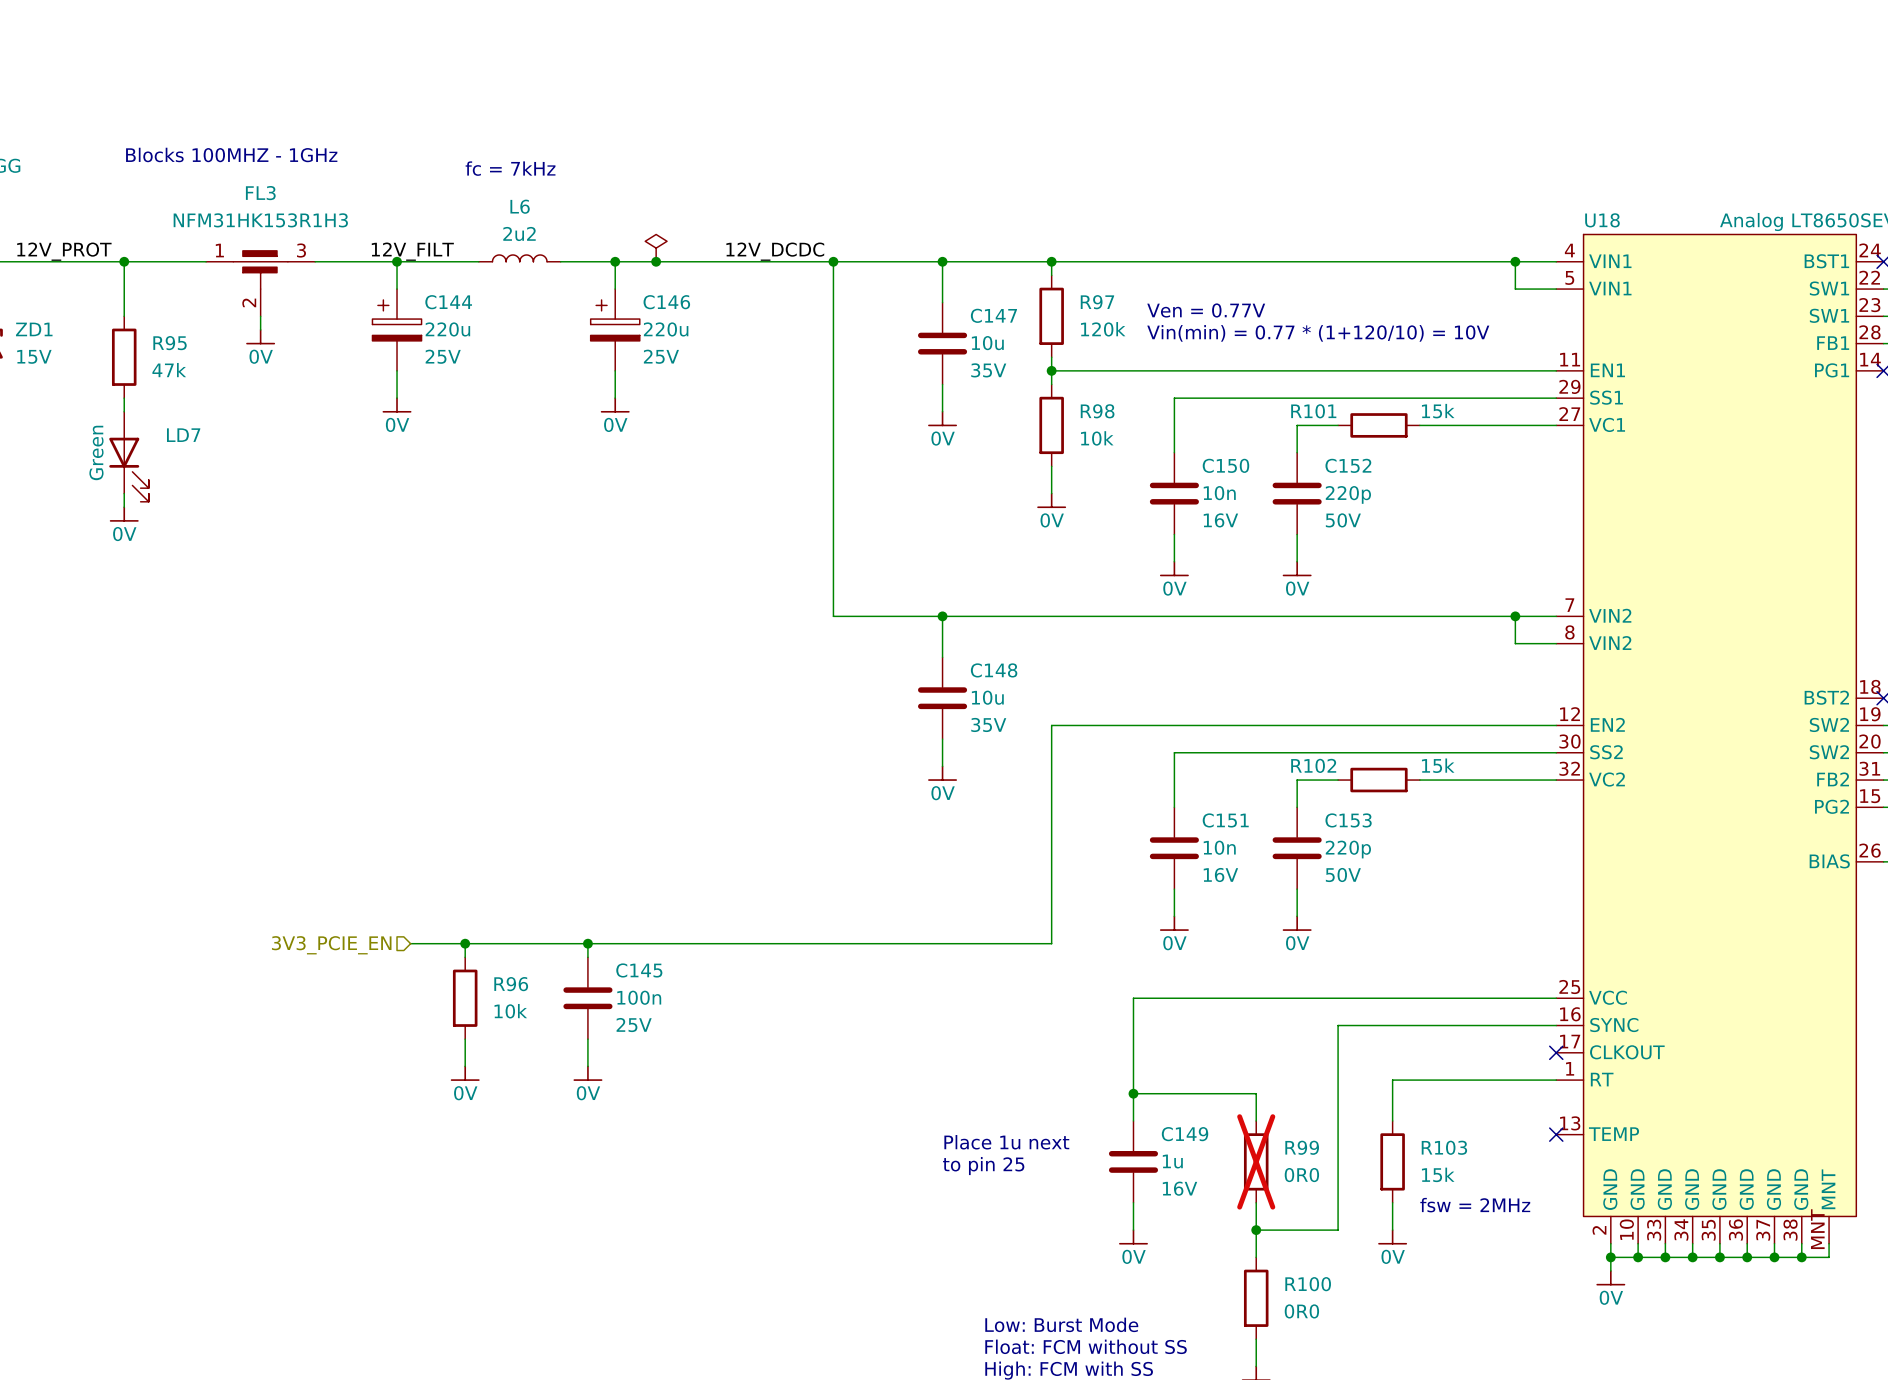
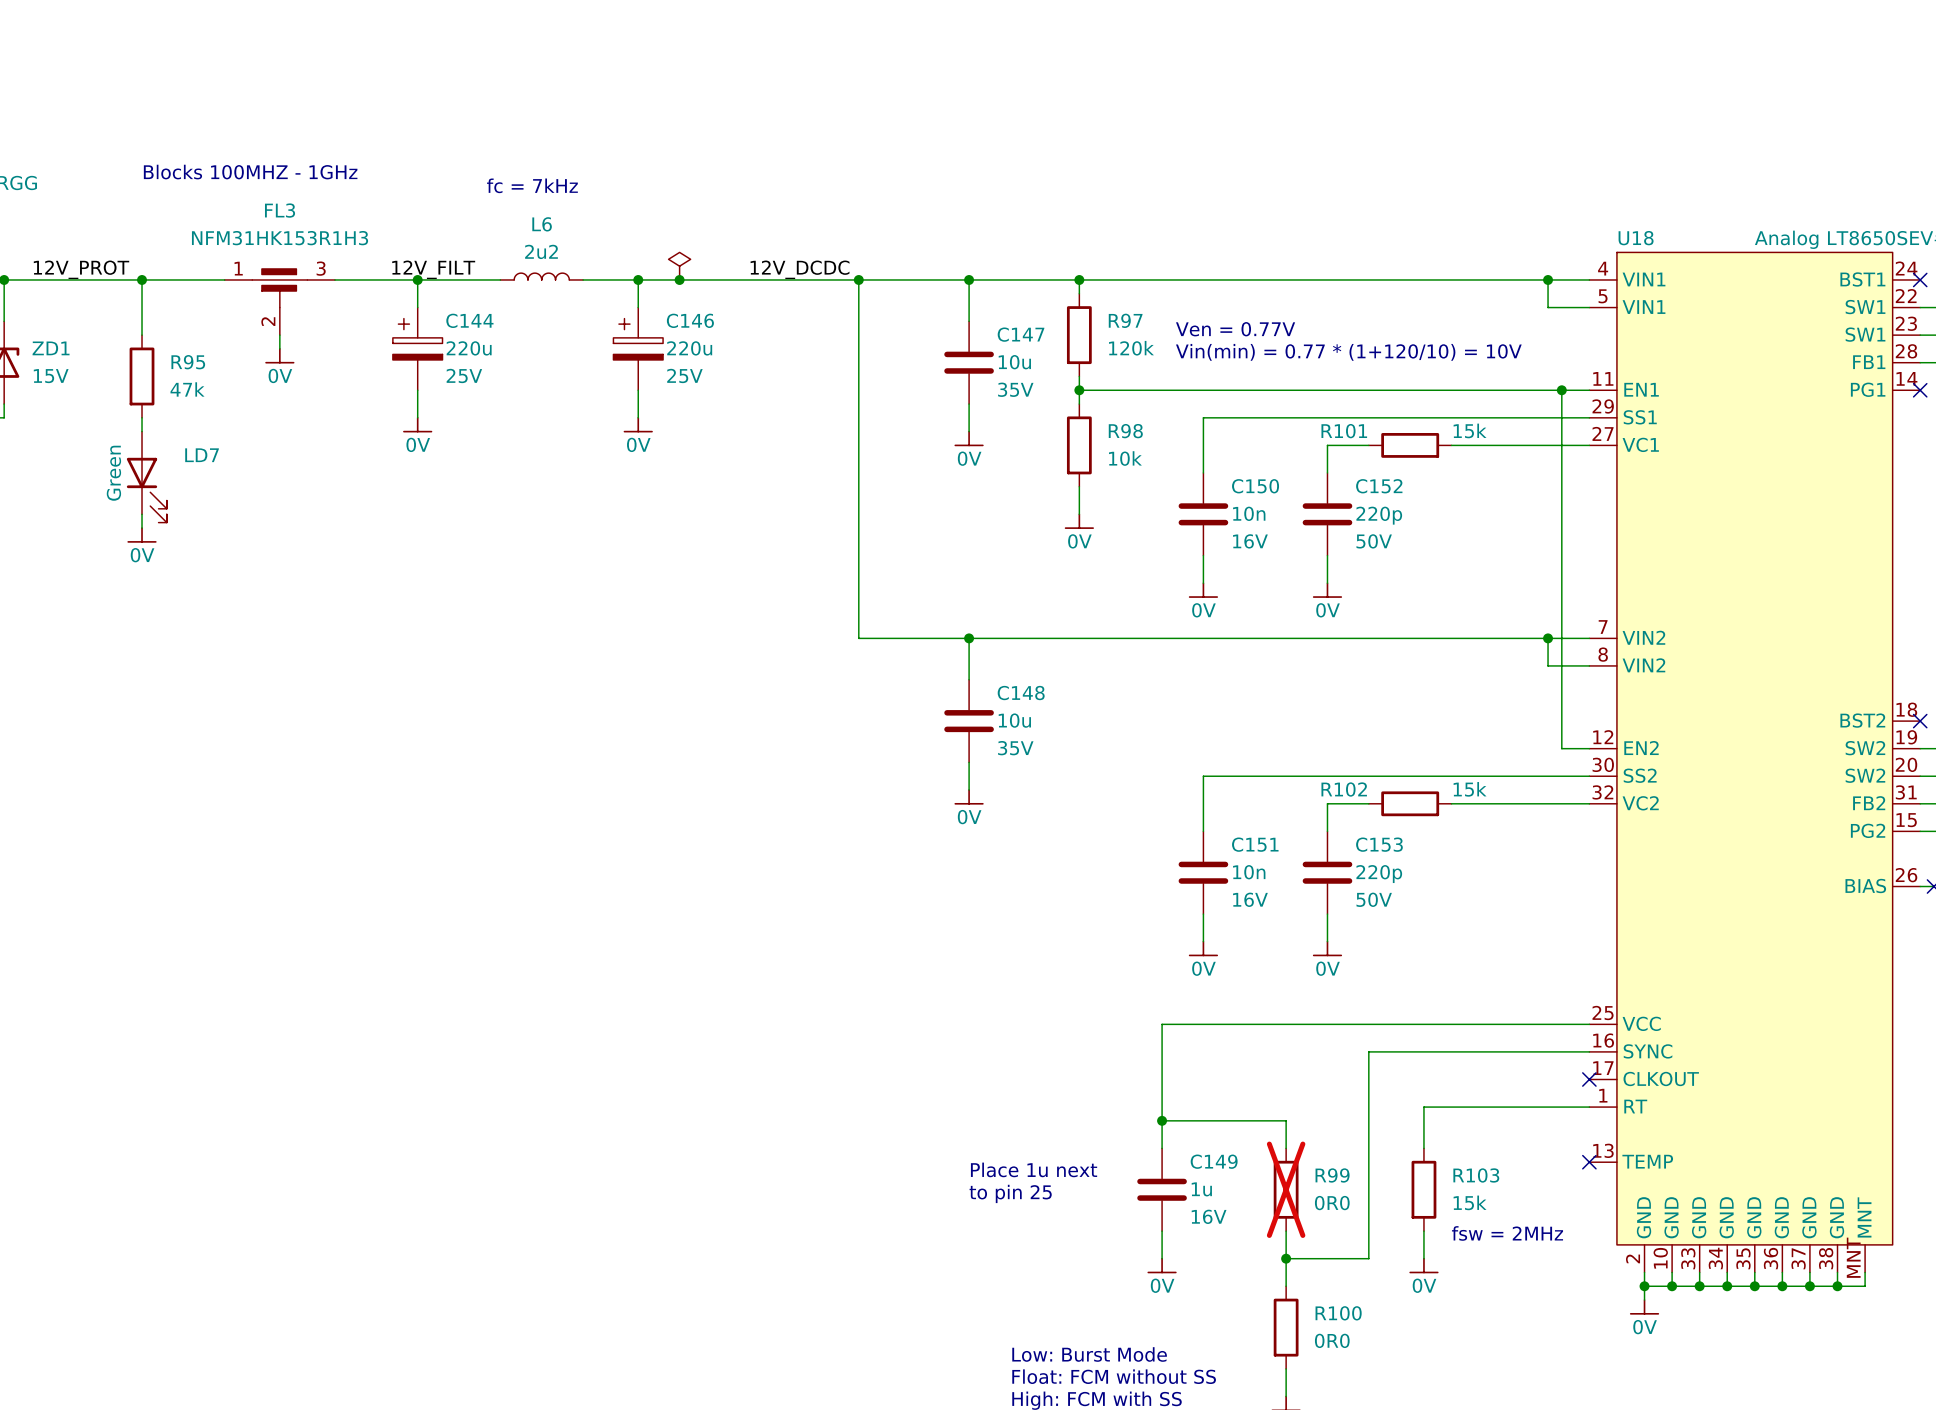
junction: none -> (1561, 390)
wire: (1529, 725) (1051, 725) (1051, 943) (410, 943) -> (1561, 748) (1561, 390)
wire: (465, 943) (465, 957) -> none
junction: (465, 943) -> none
wire: (587, 943) (587, 957) -> none
junction: (587, 943) -> none
hierarchical label: 3V3_PCIE_EN (331, 945) -> none
R96: 10k (465, 998) -> none
C145: 100n (587, 998) -> none
wire: (465, 1039) (465, 1066) -> none
wire: (587, 1039) (587, 1066) -> none
power symbol: 0V (465, 1073) -> none
power symbol: 0V (587, 1073) -> none

